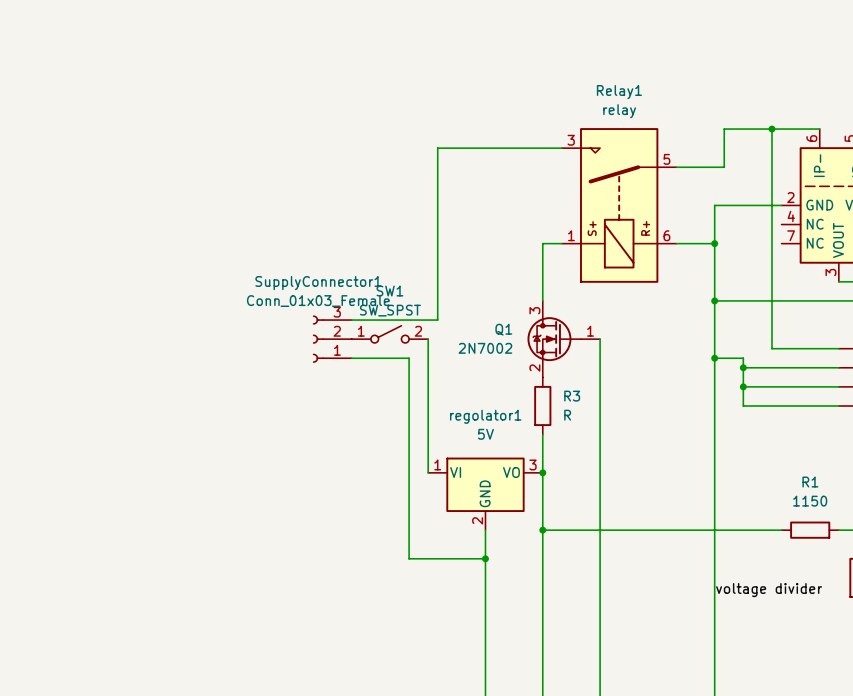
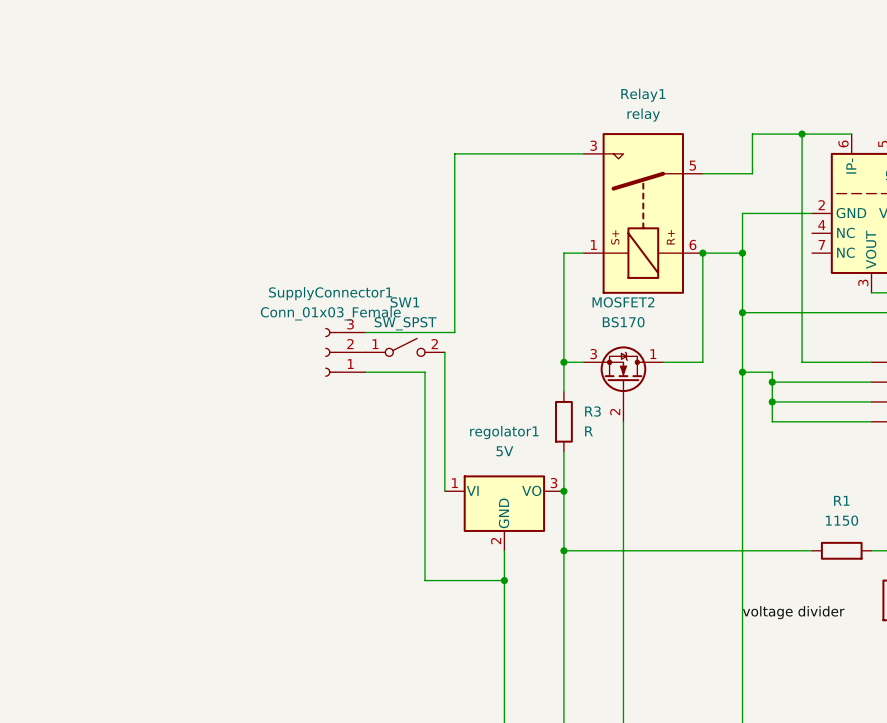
wire: none -> (702, 253) (702, 362) (663, 362)
junction: none -> (702, 253)
Q1: 2N7002 (563, 339) -> none
wire: none -> (563, 362) (583, 362)
junction: none -> (563, 362)
MOSFET2: none -> BS170 (623, 384)

